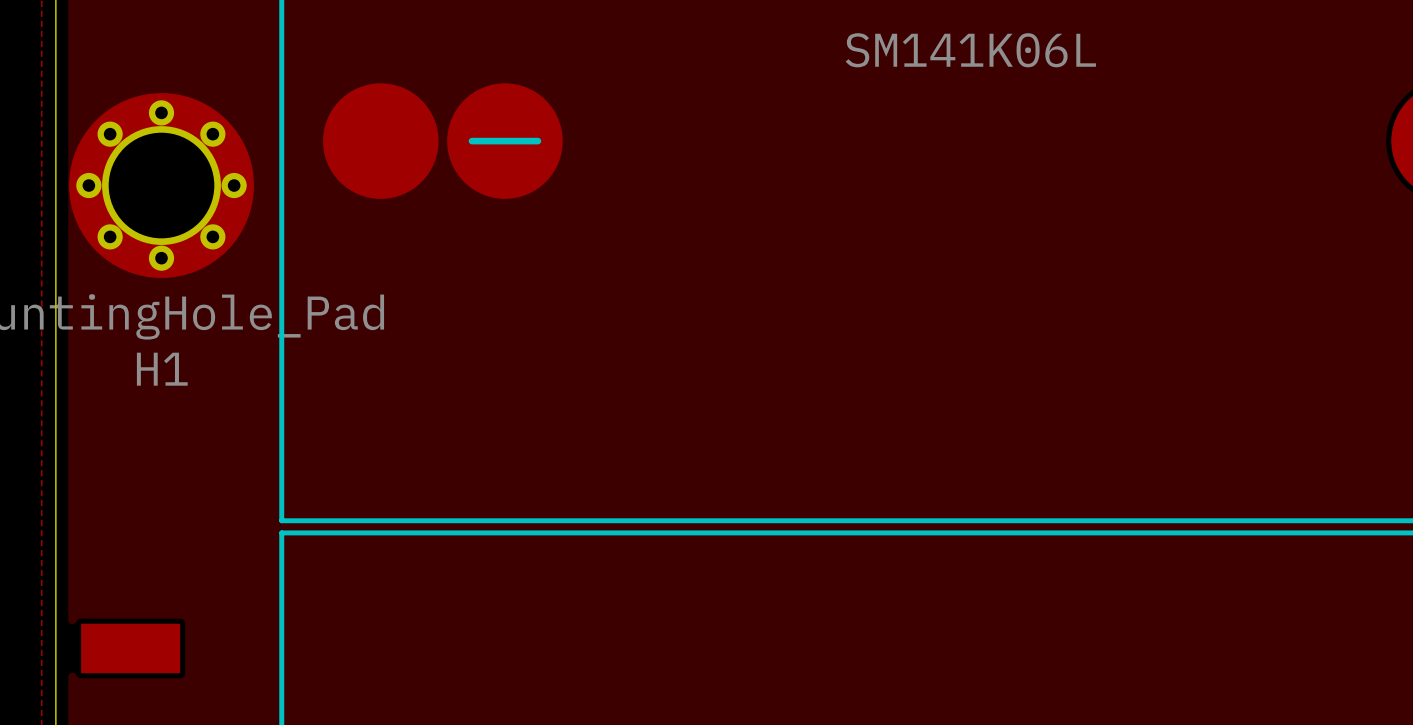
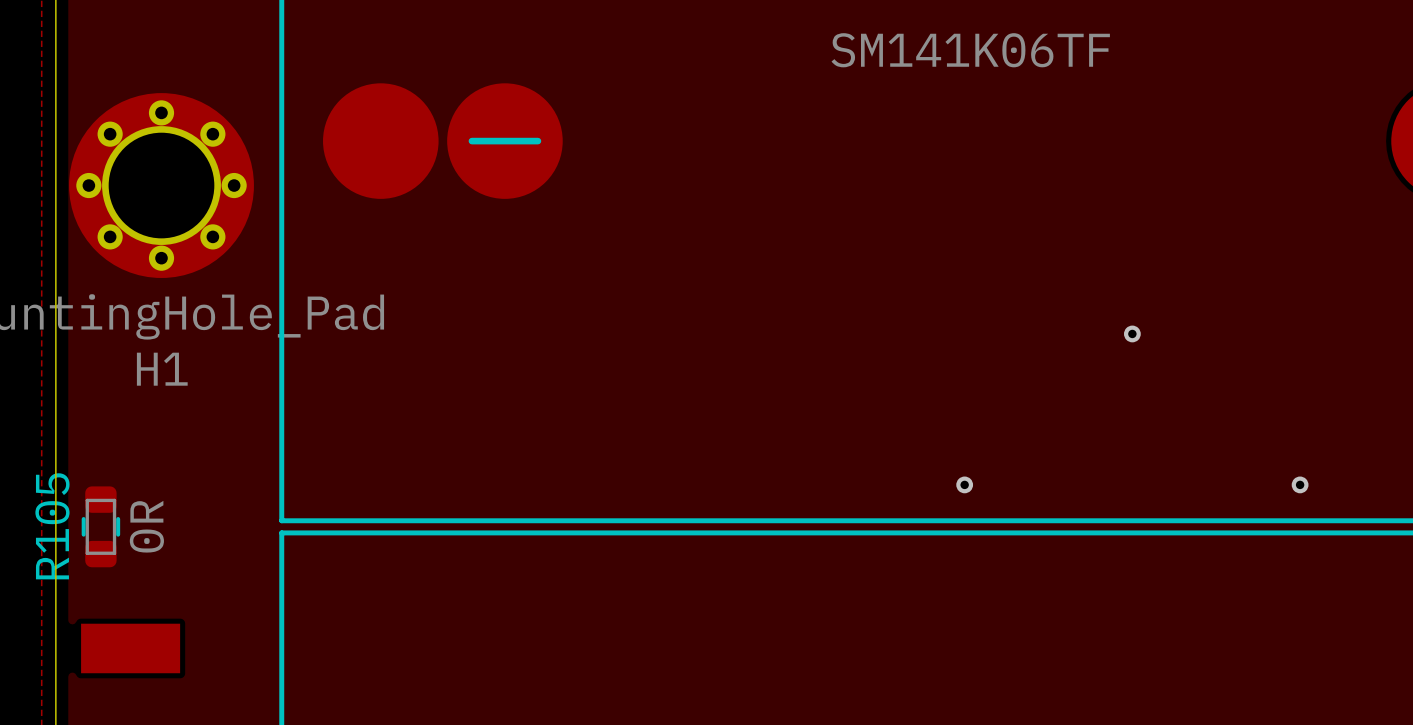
part value: SM141K06L (970, 50) -> SM141K06TF (970, 50)
via: none -> (1132, 333)
via: none -> (964, 484)
via: none -> (1300, 484)
R105: none -> 0R (100, 526)

